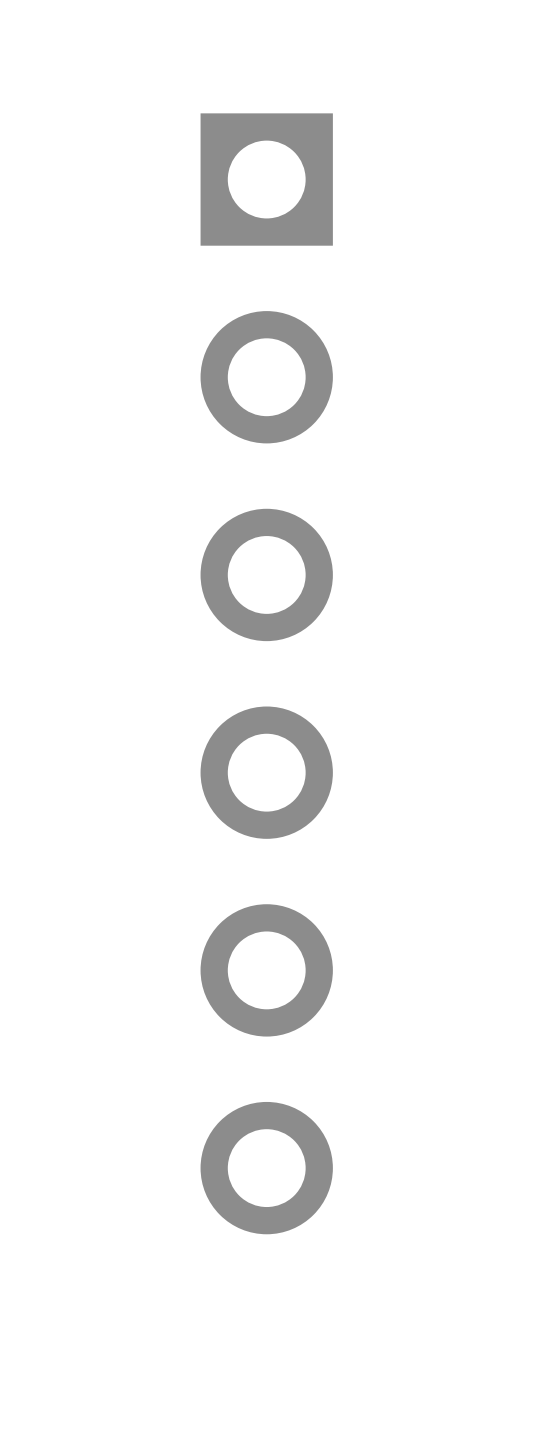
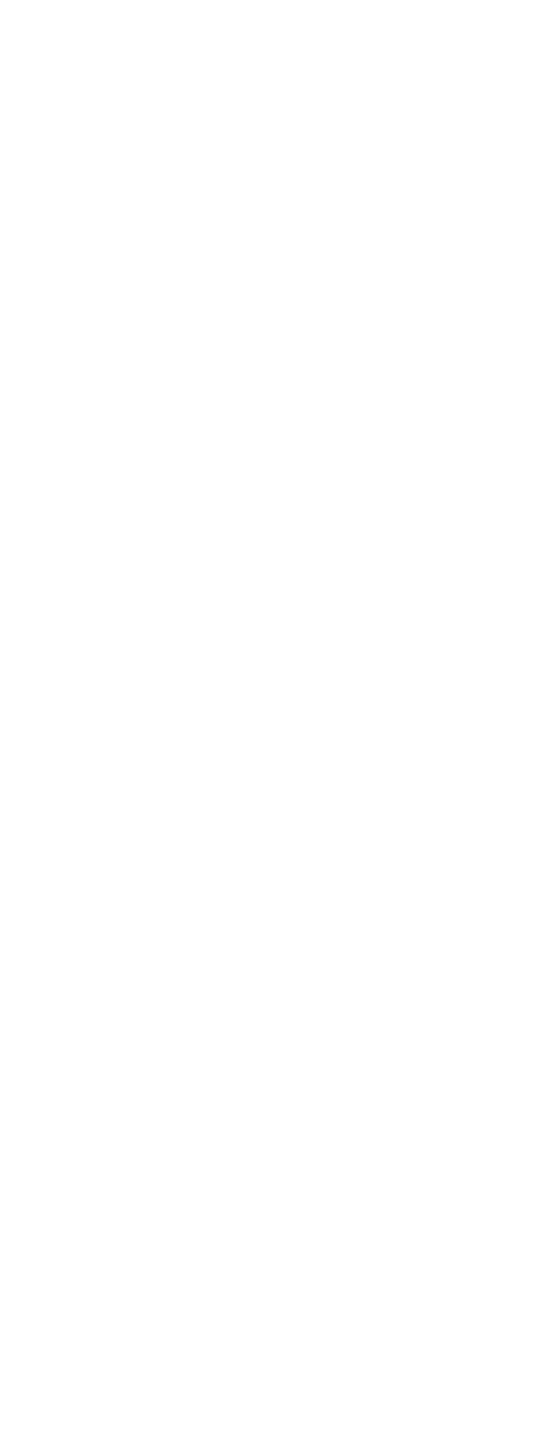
part: (266, 673) -> none

